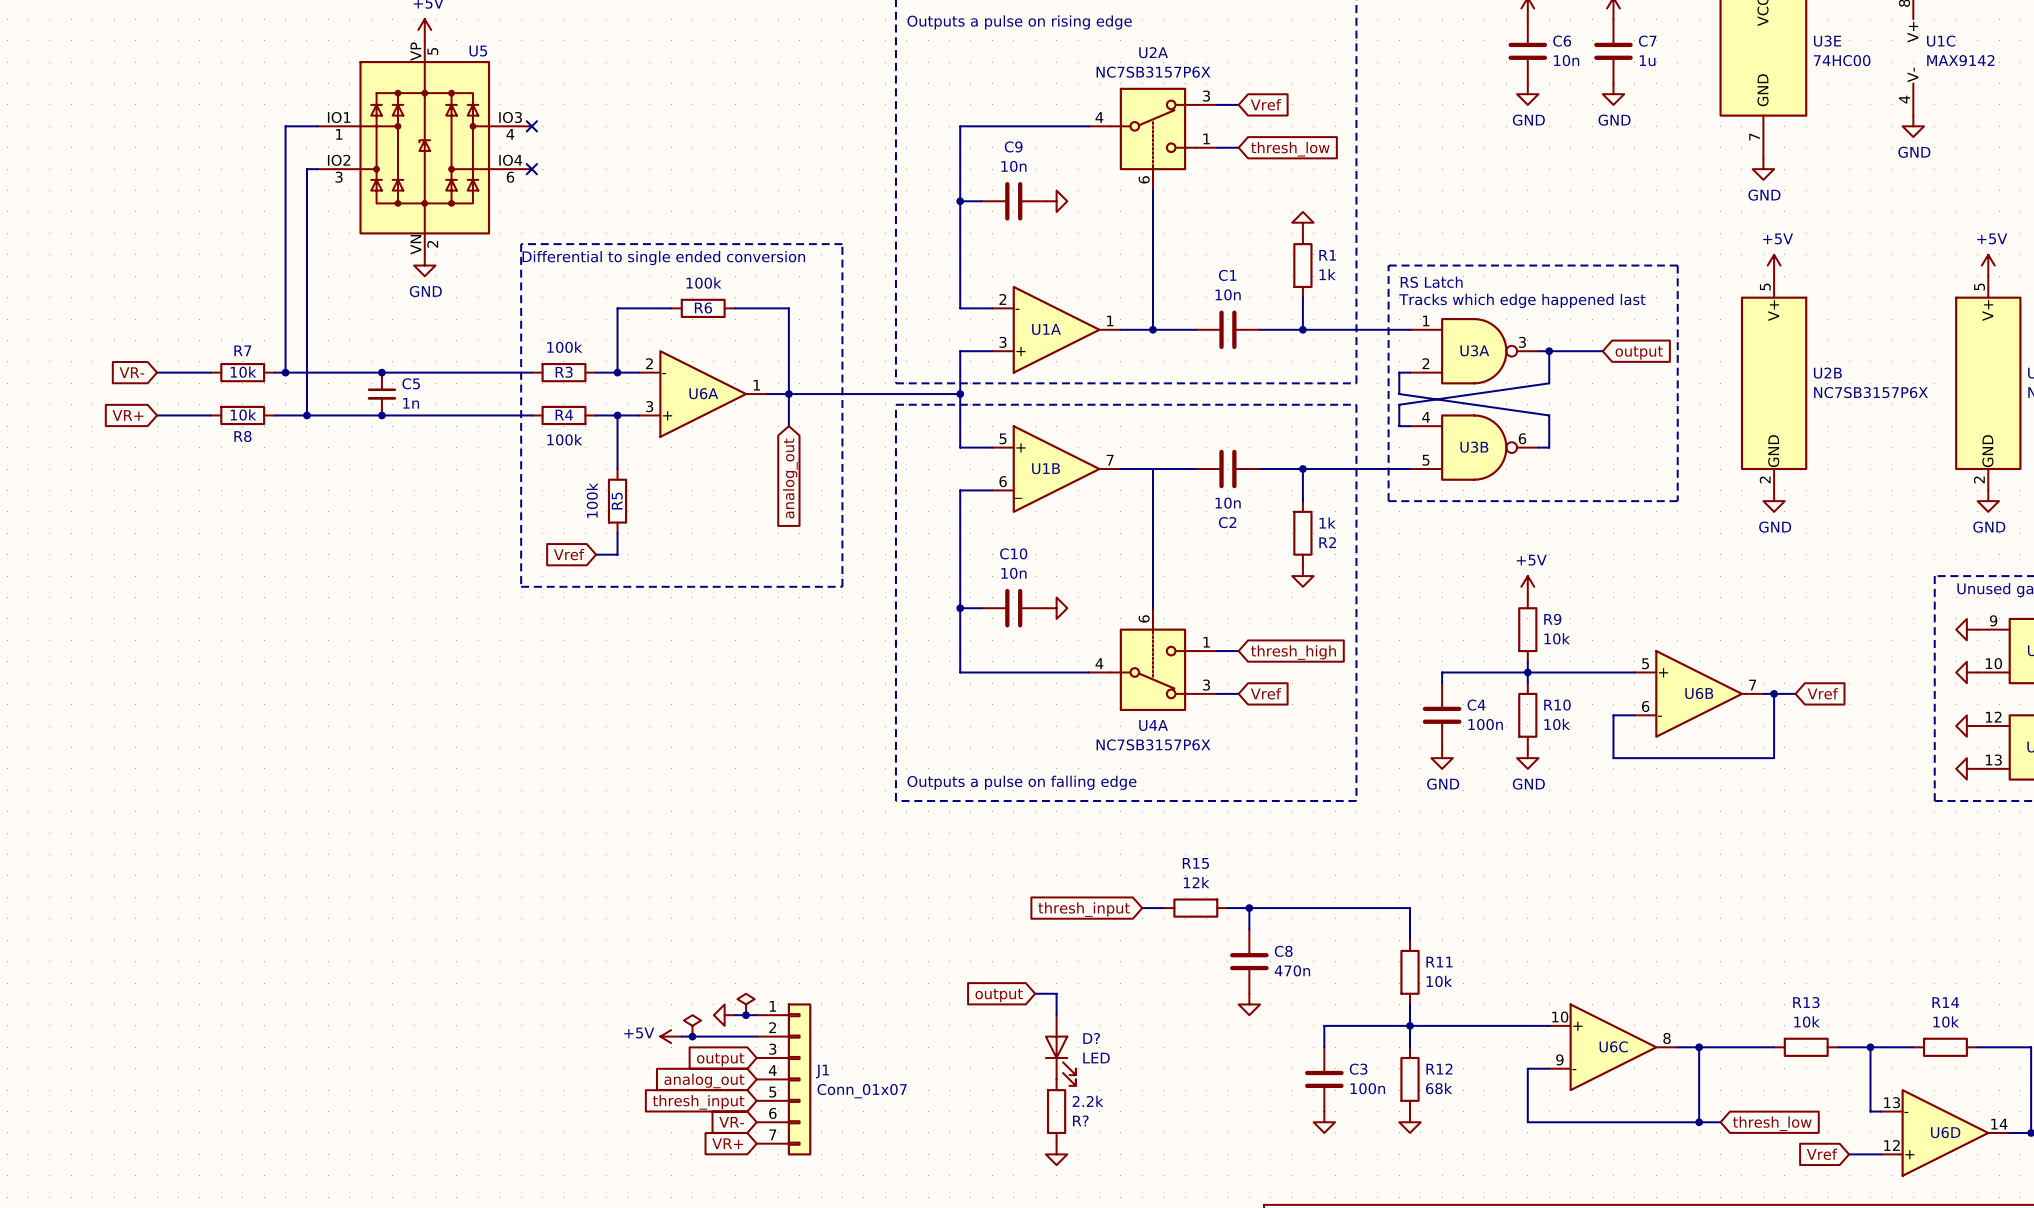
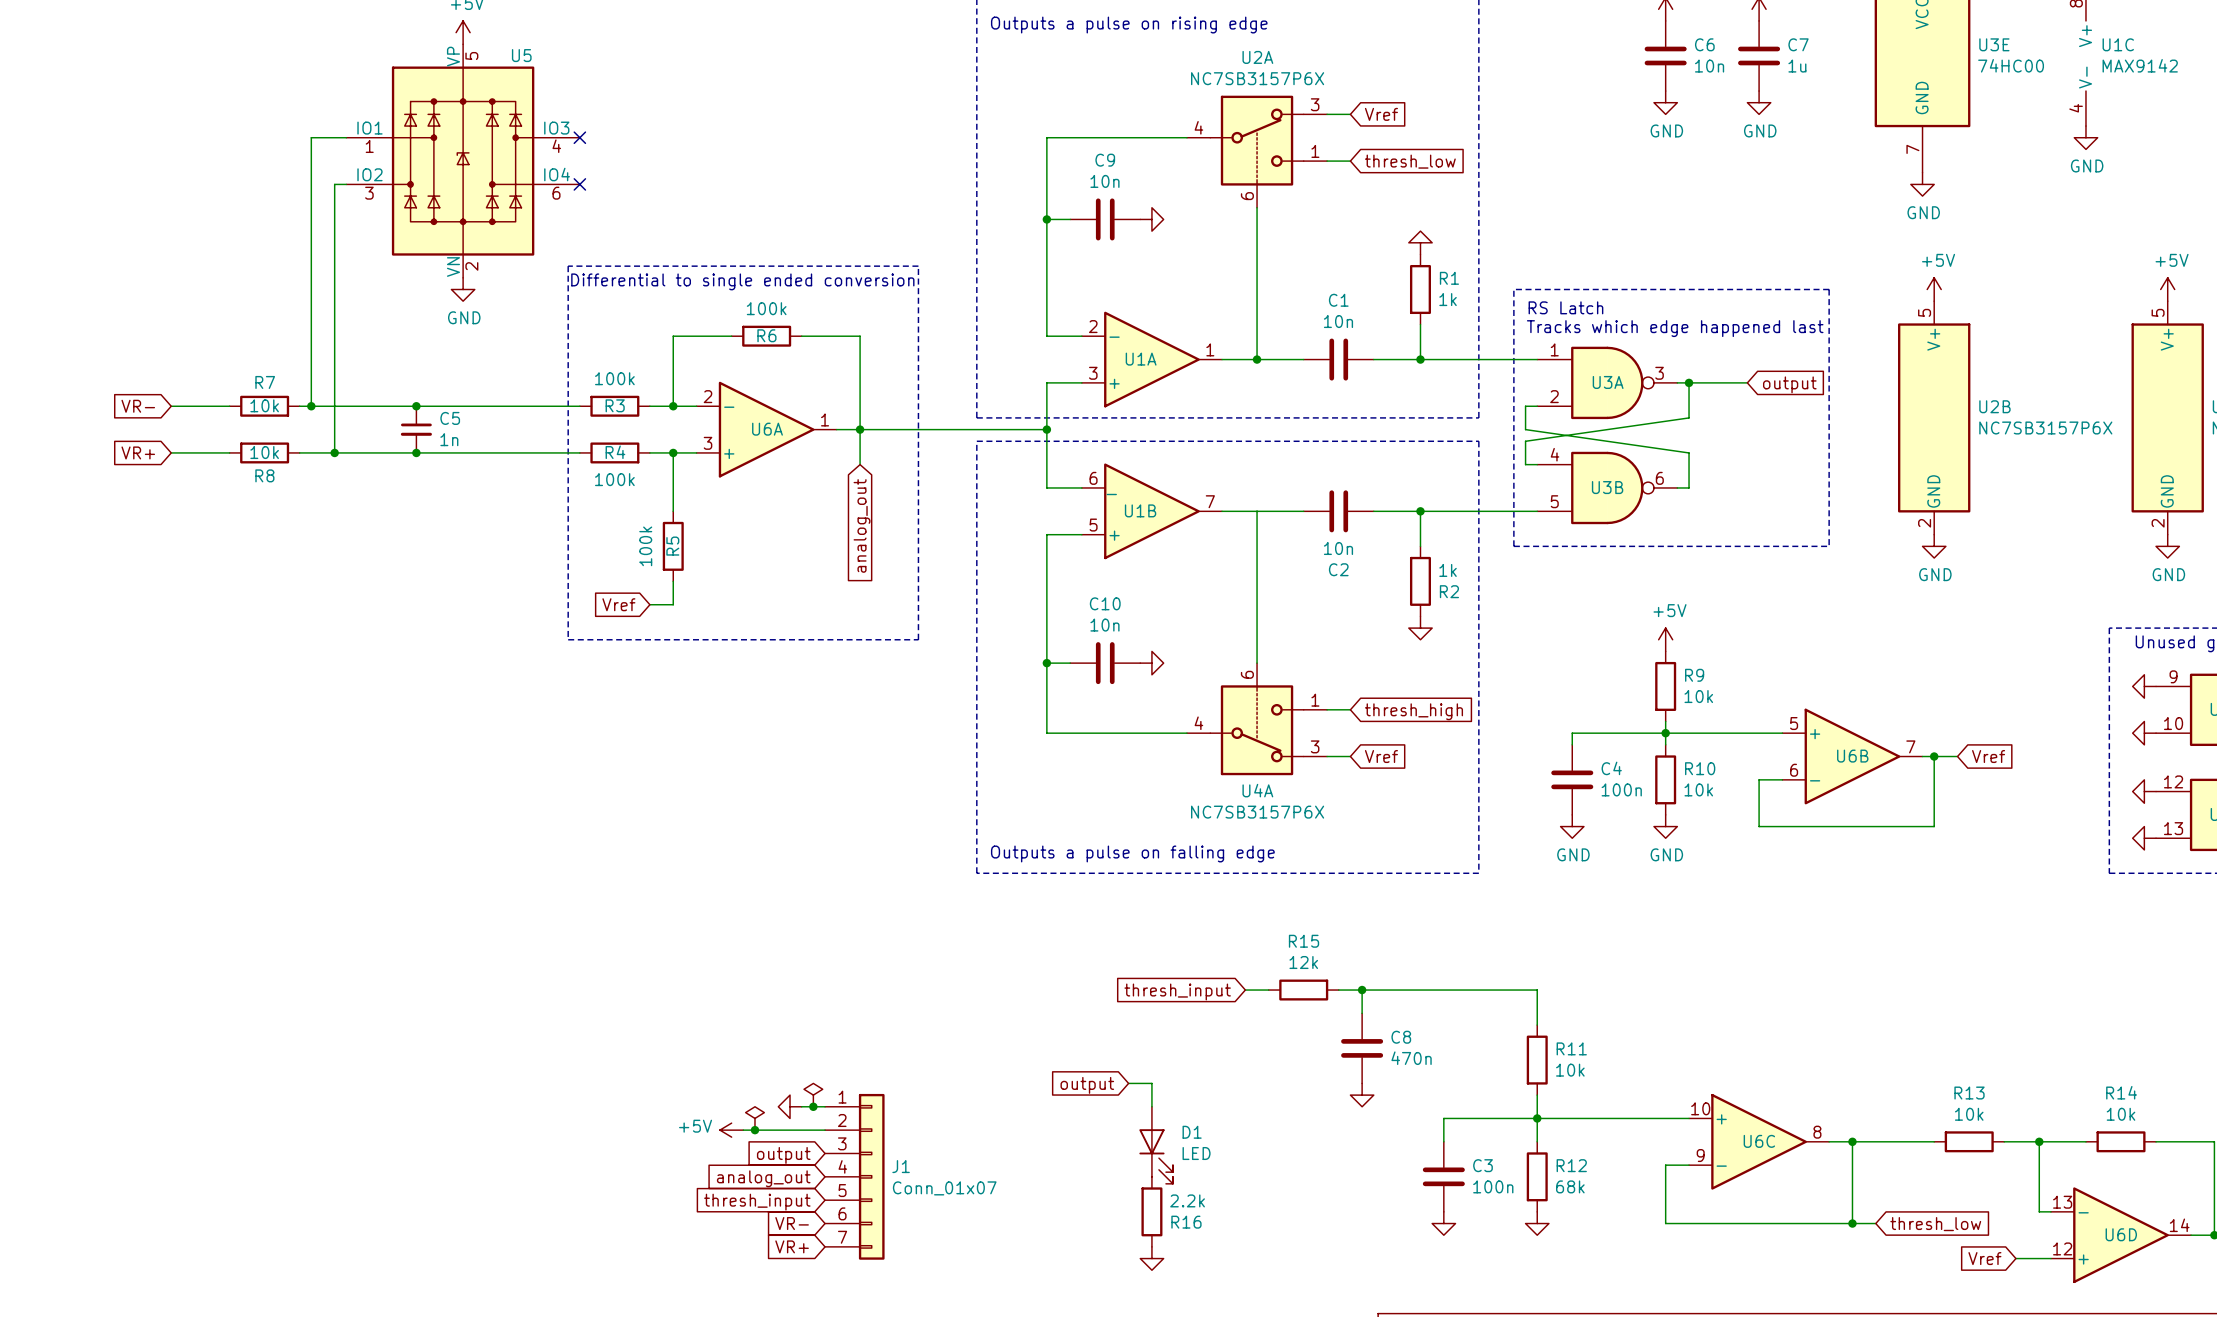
U1B flip: as is (1056, 469) -> up-down (1151, 511)
D? name: D? (1091, 1038) -> D1 (1192, 1132)
R? name: R? (1080, 1120) -> R16 (1186, 1222)

